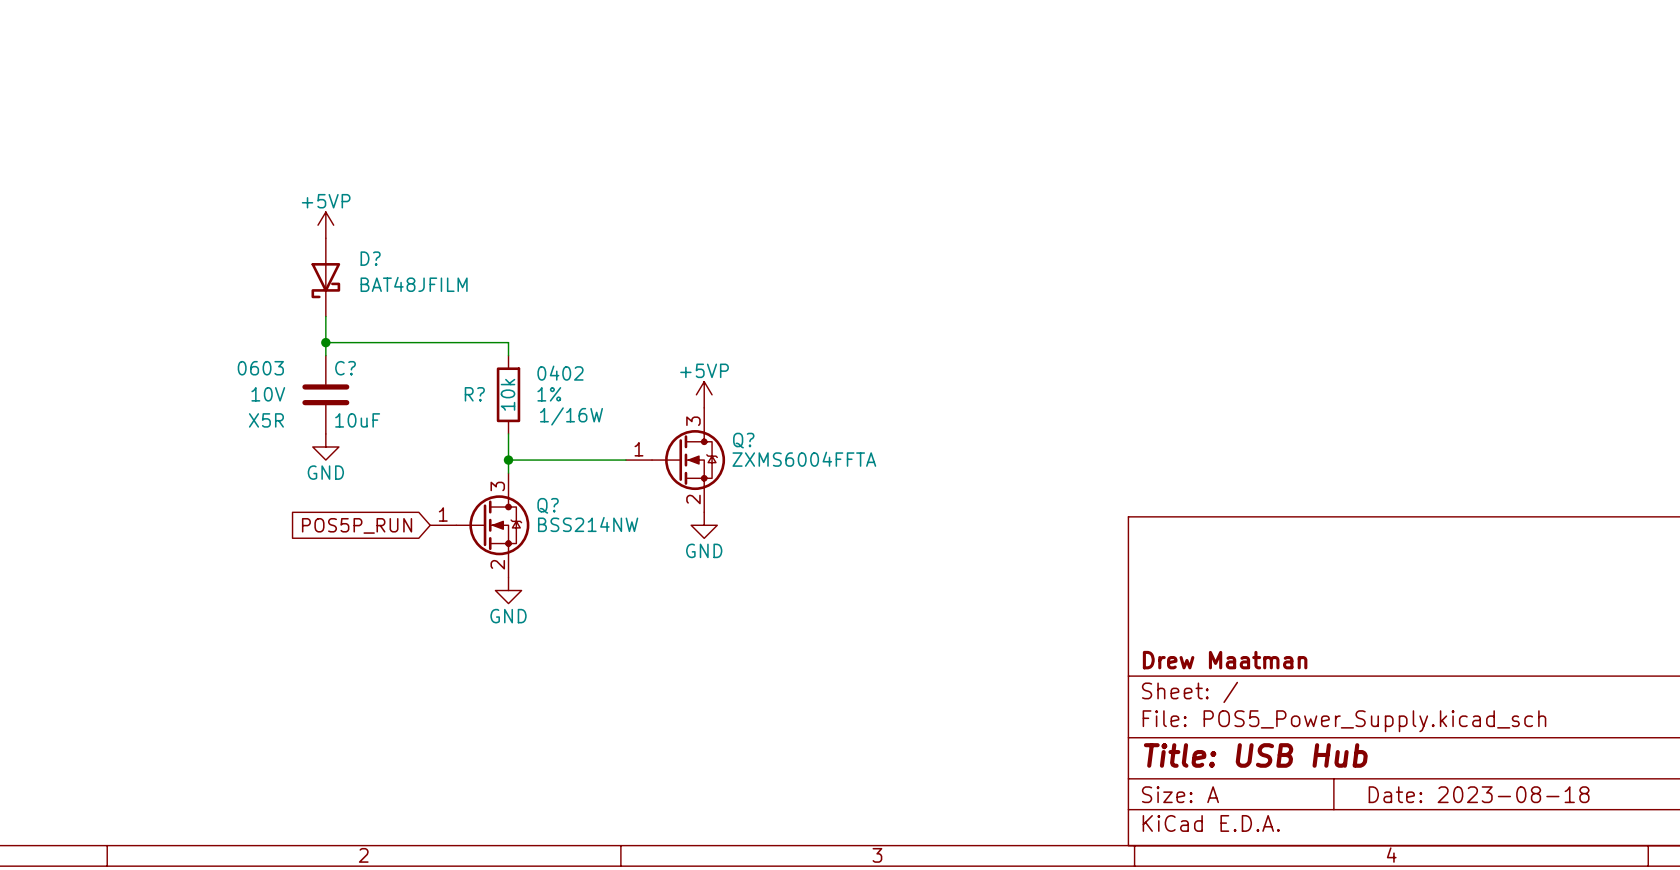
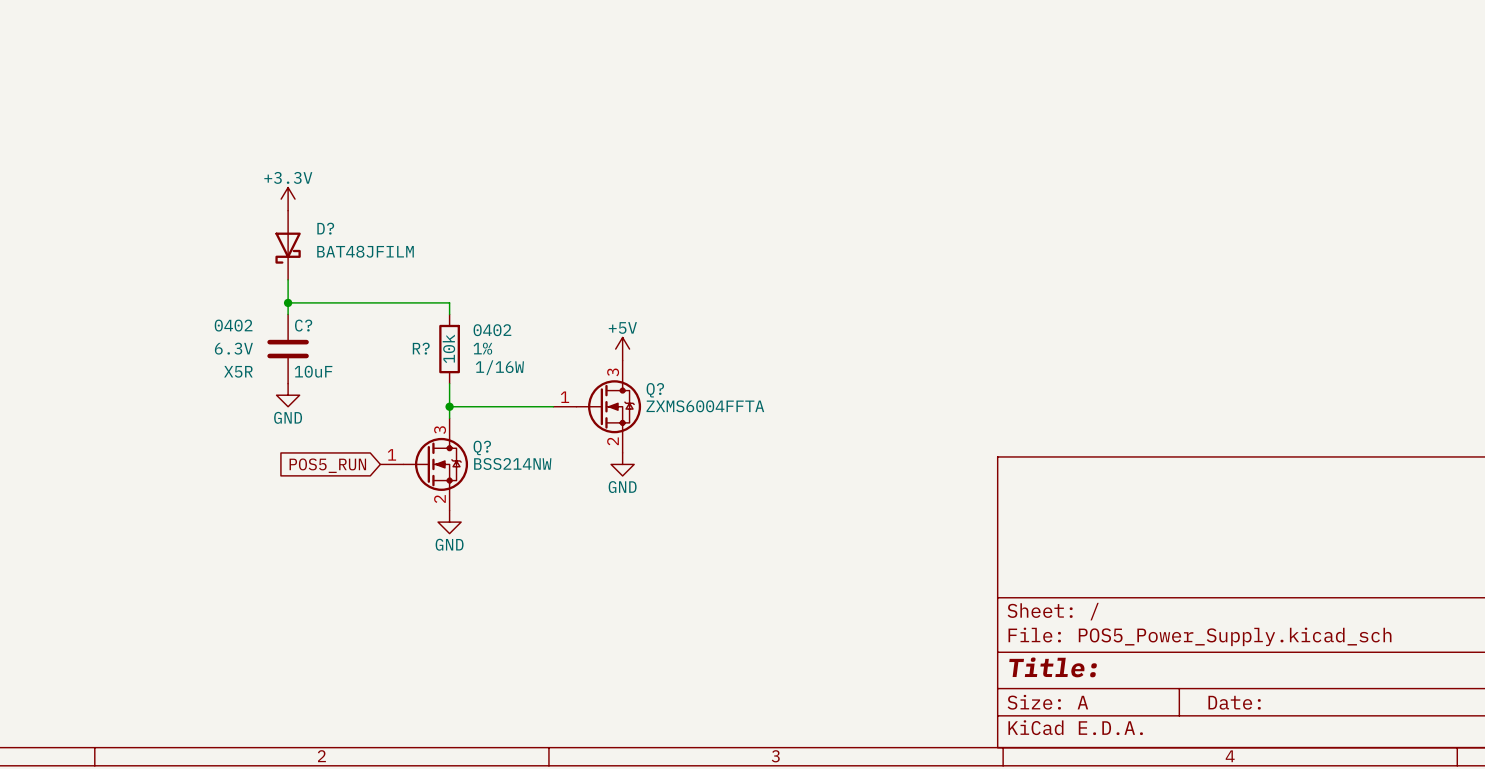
power symbol: +5VP (325, 225) -> +3.3V (288, 199)
C? text: 0603 (260, 368) -> 0402 (233, 325)
C? text: 10V (268, 394) -> 6.3V (233, 348)
power symbol: +5VP (704, 394) -> +5V (622, 349)
global label: POS5P_RUN (357, 525) -> POS5_RUN (327, 465)
title block: Drew Maatman (1225, 660) -> none
title block: Title: USB Hub (1255, 755) -> Title: (1053, 667)
title block: Date: 2023-08-18 (1479, 794) -> Date: (1234, 702)

